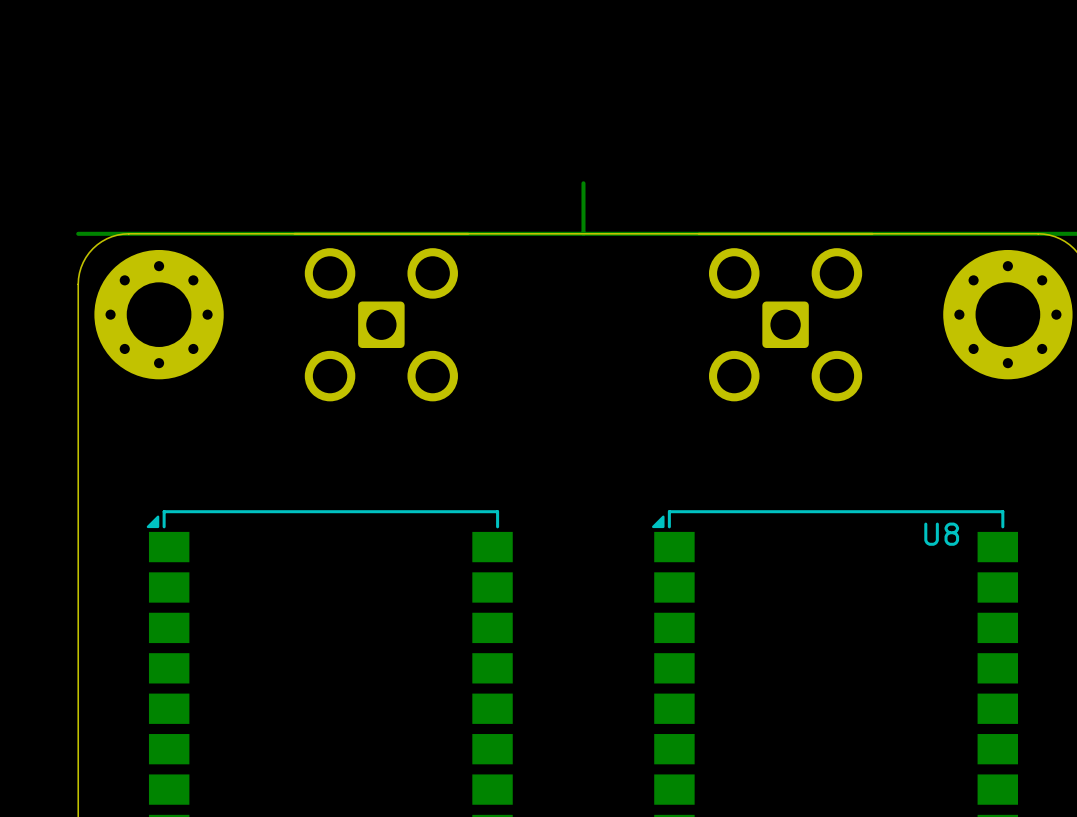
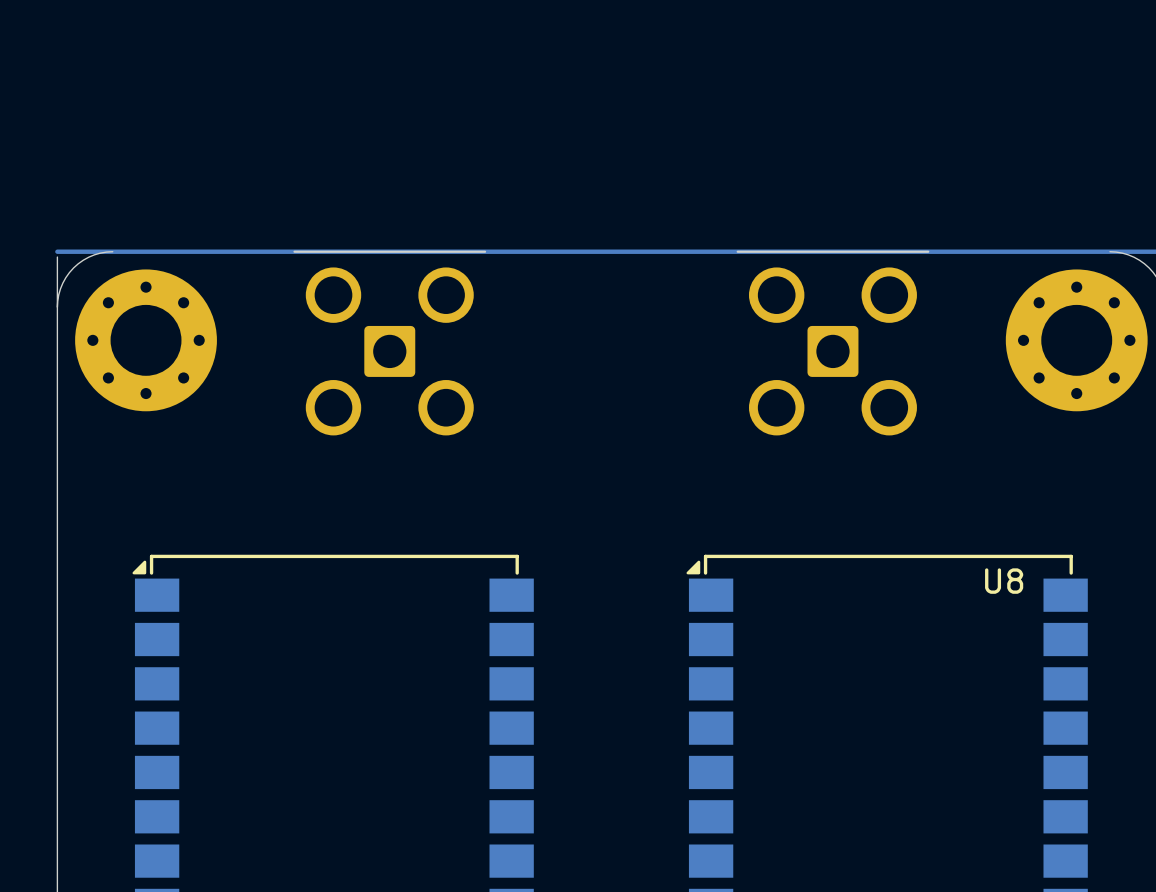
track: (583, 183) (583, 233) -> none
board edge: (1038, 233) (128, 233) -> none
board edge: none -> (57, 257) (57, 307)

